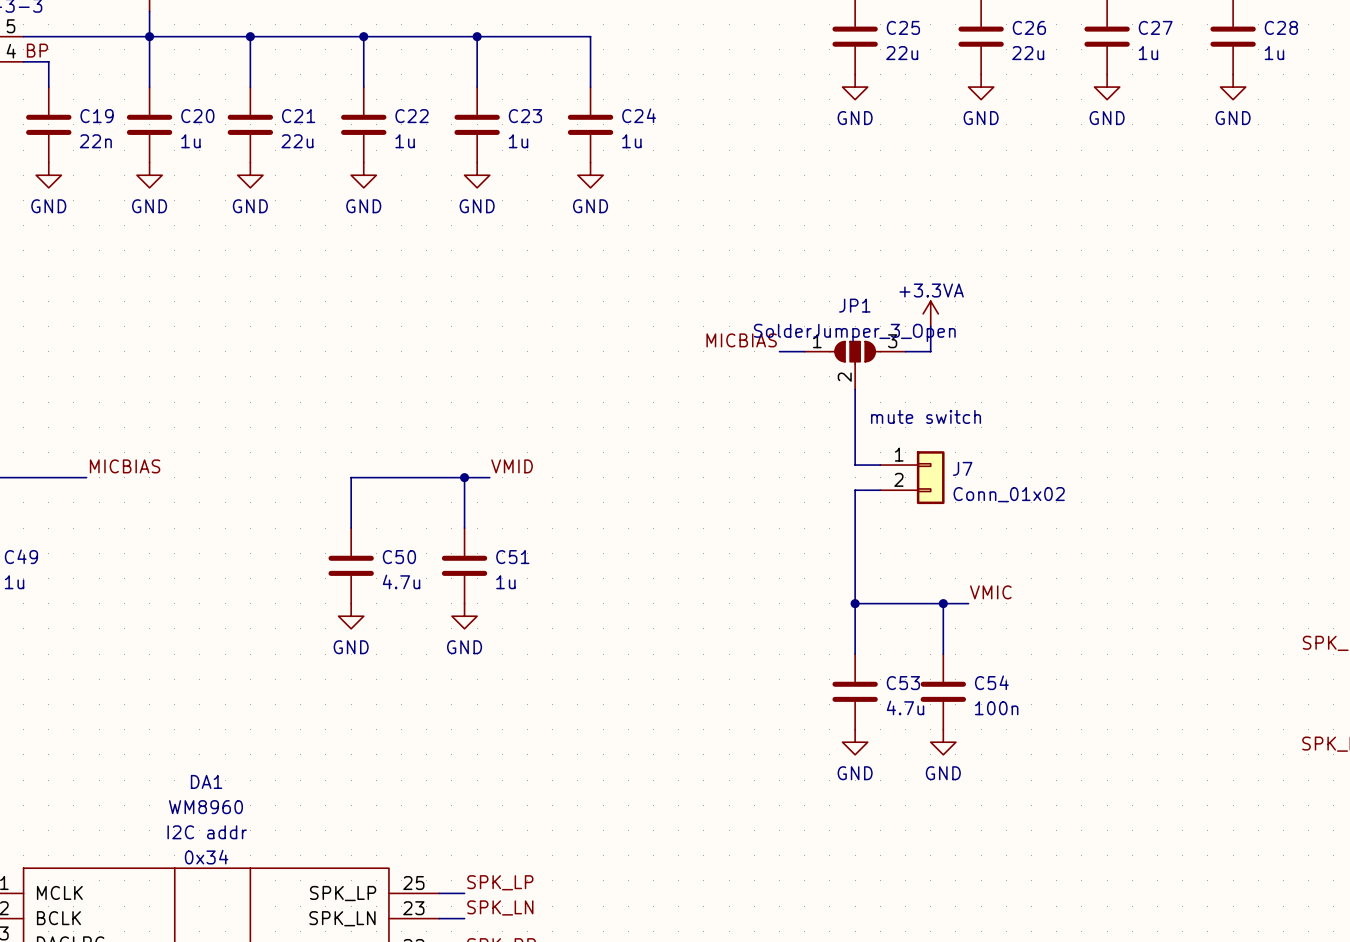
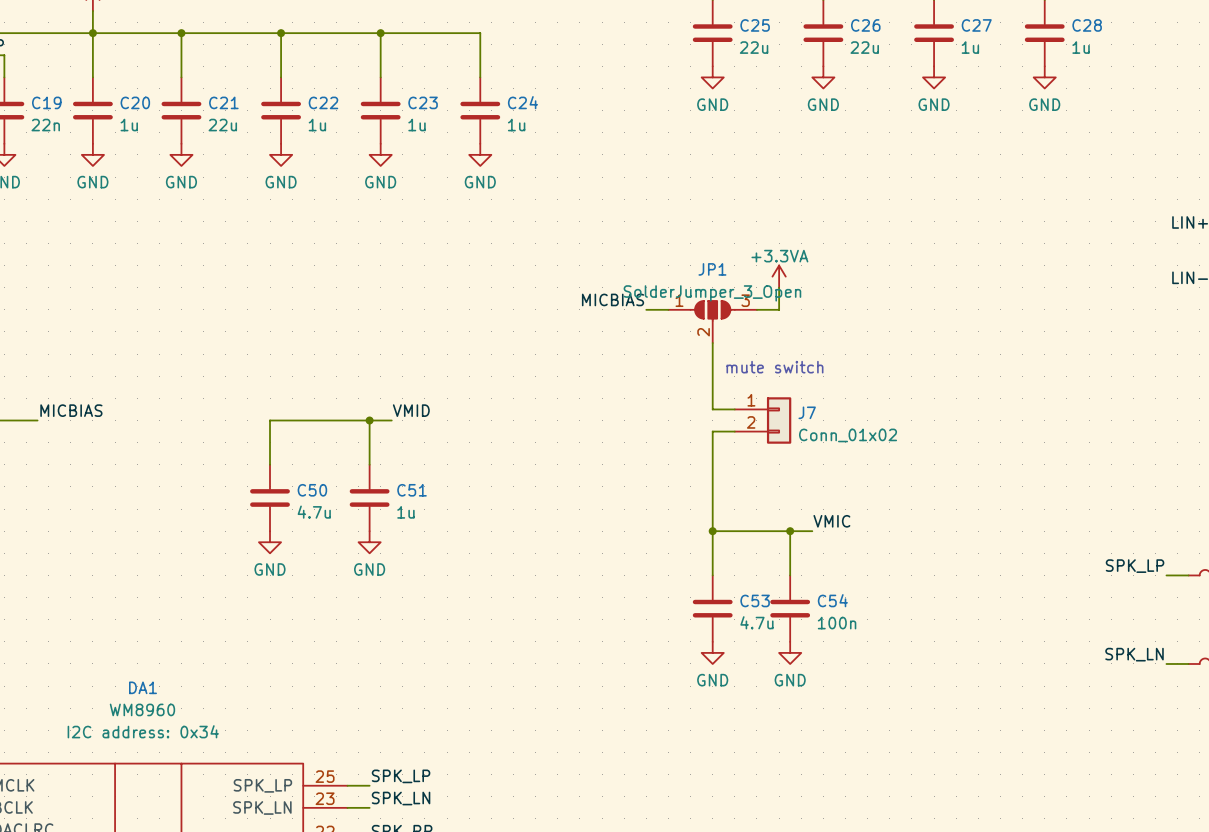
DA1 text: none -> I2C address: 0x34 (143, 731)
DA1 text: I2C addr (207, 832) -> none
DA1 text: 0x34 (206, 857) -> none

